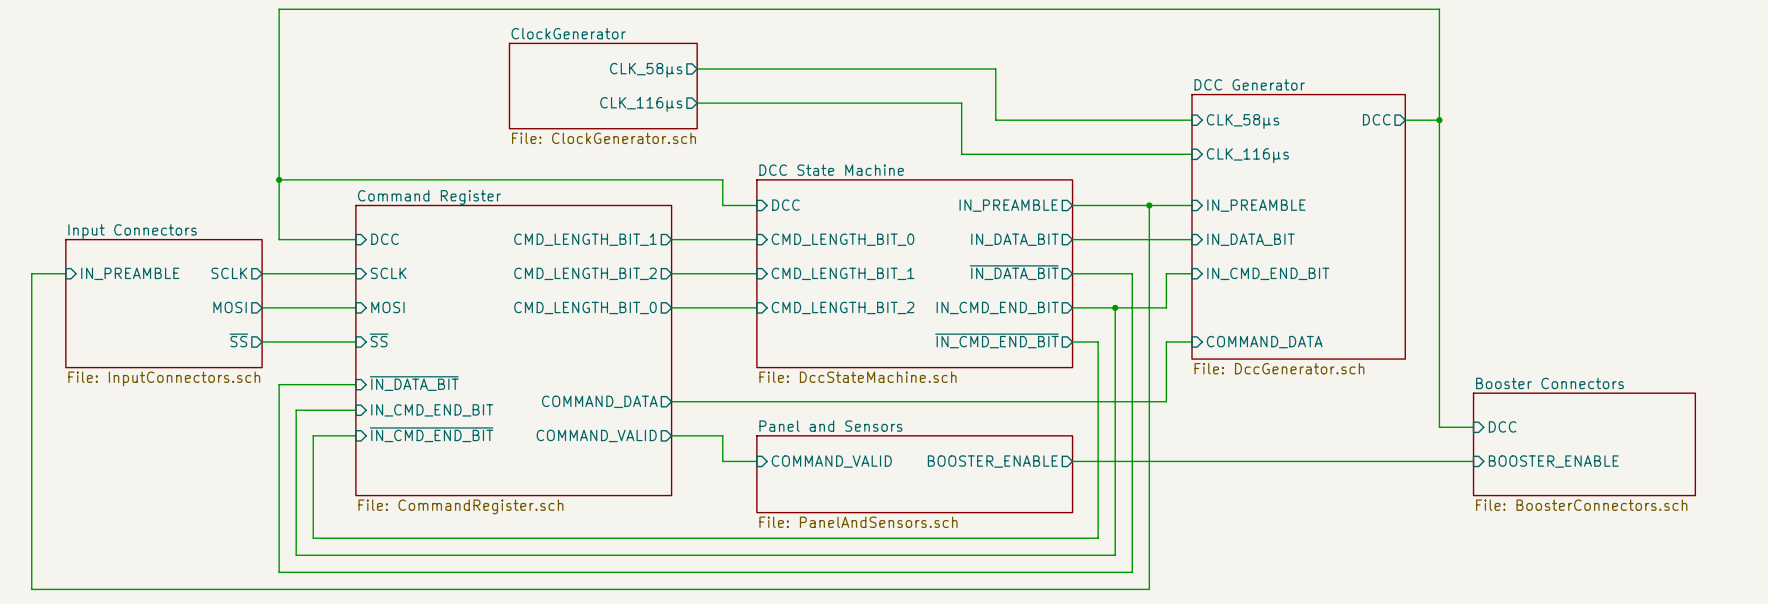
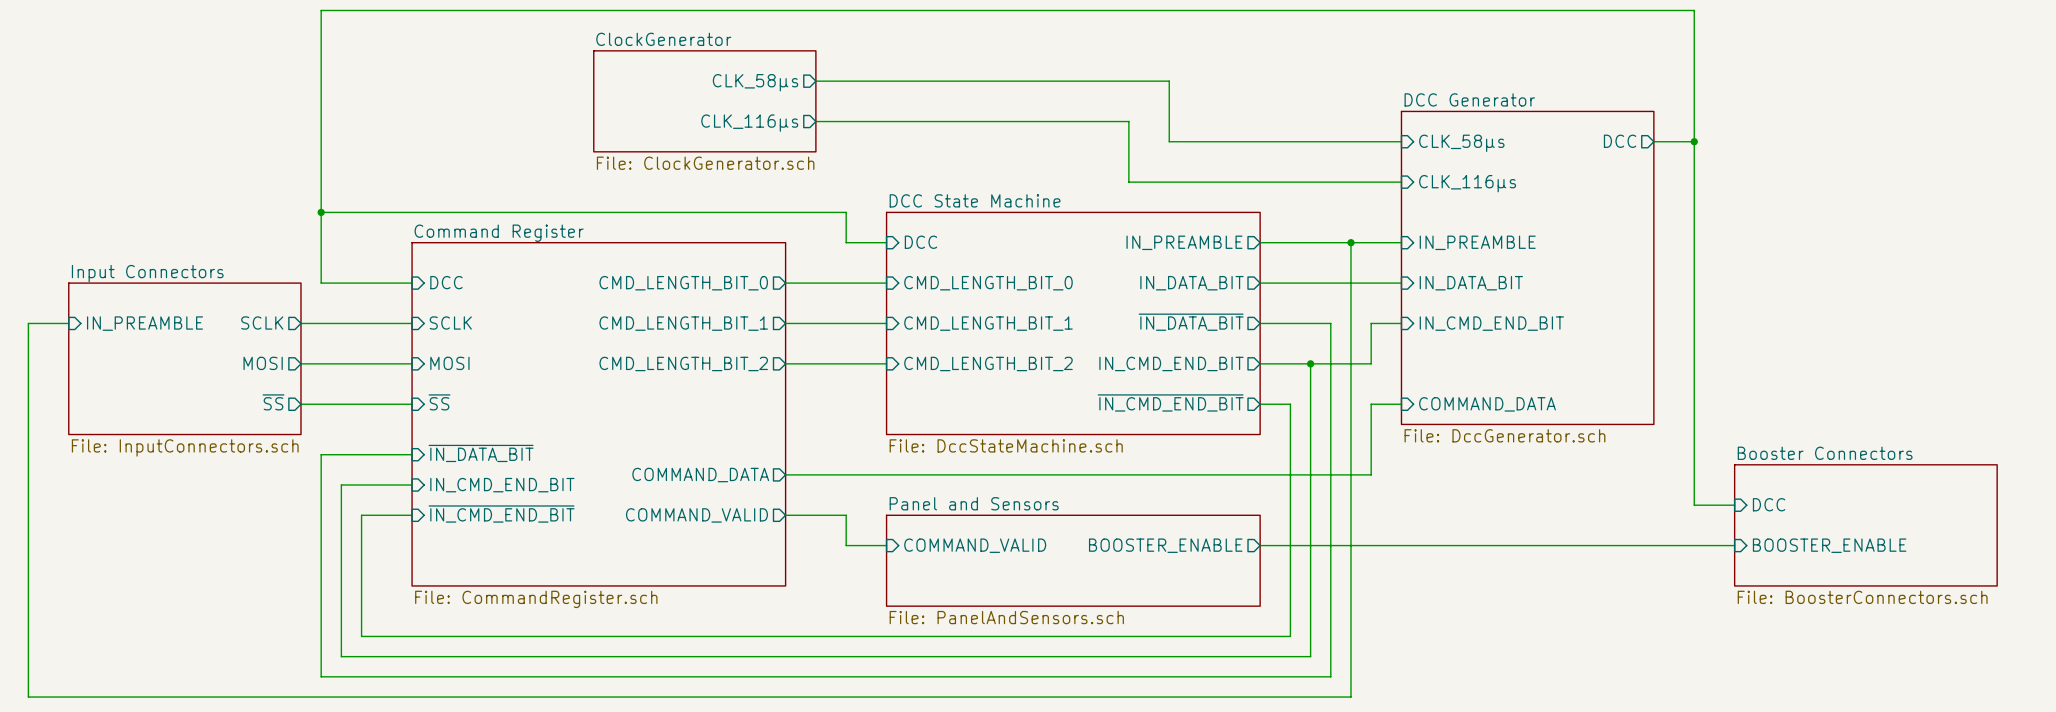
sheet pin: CMD_LENGTH_BIT_1 (585, 239) -> CMD_LENGTH_BIT_0 (683, 283)
sheet pin: CMD_LENGTH_BIT_2 (585, 273) -> CMD_LENGTH_BIT_1 (683, 323)
sheet pin: CMD_LENGTH_BIT_0 (585, 307) -> CMD_LENGTH_BIT_2 (683, 363)

